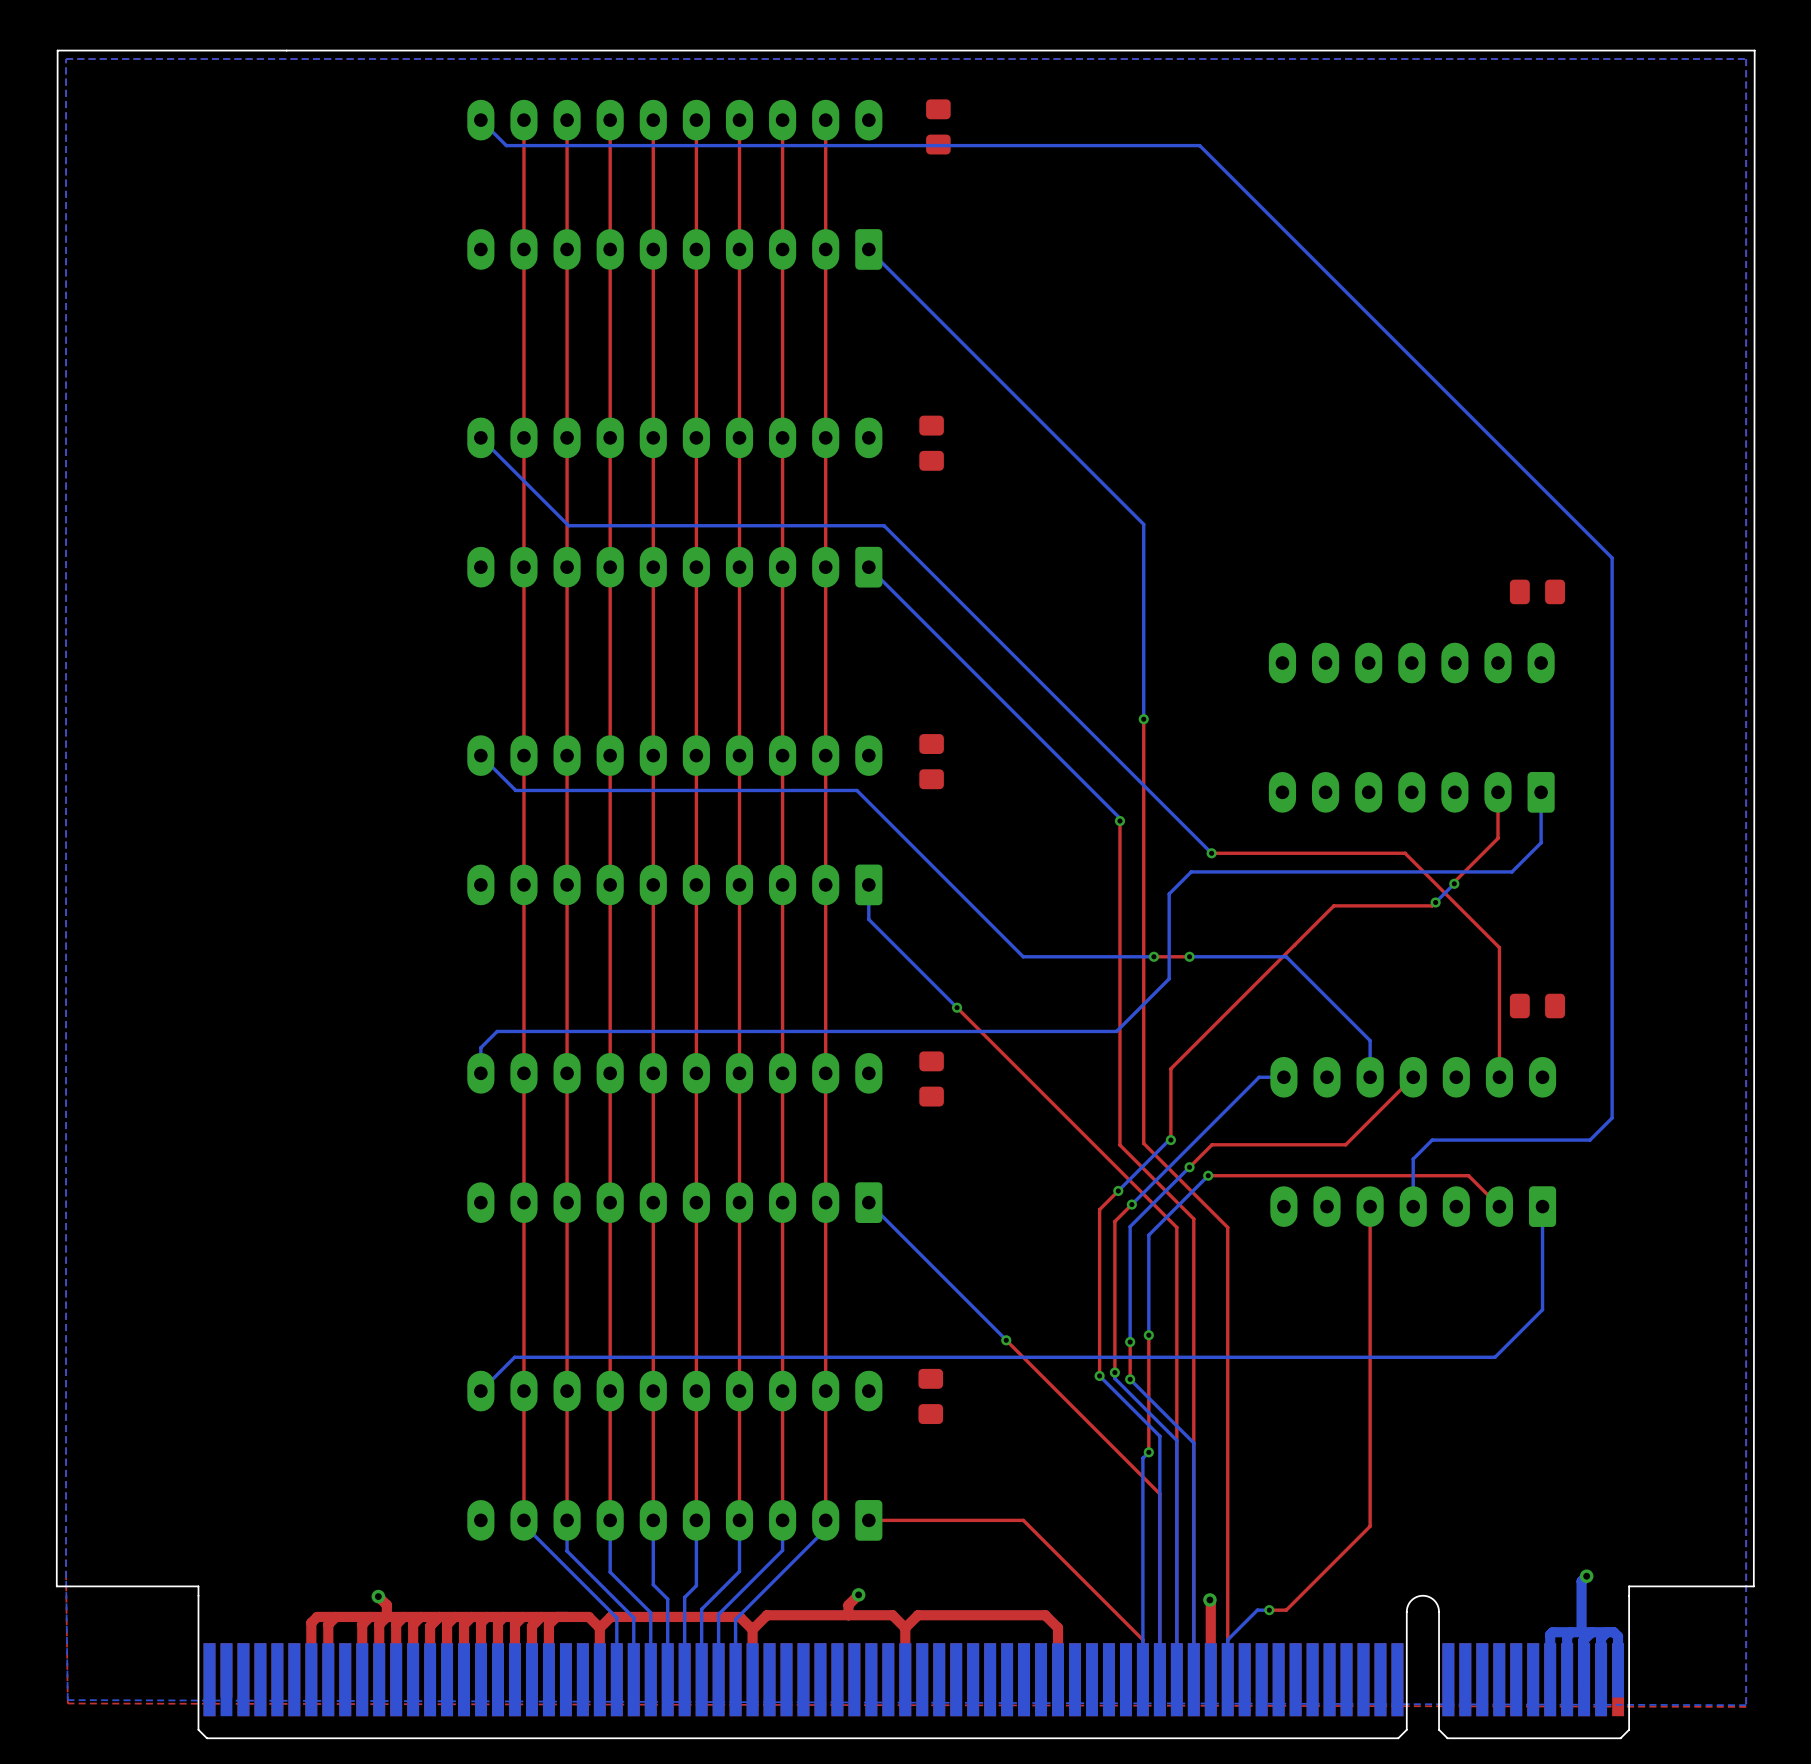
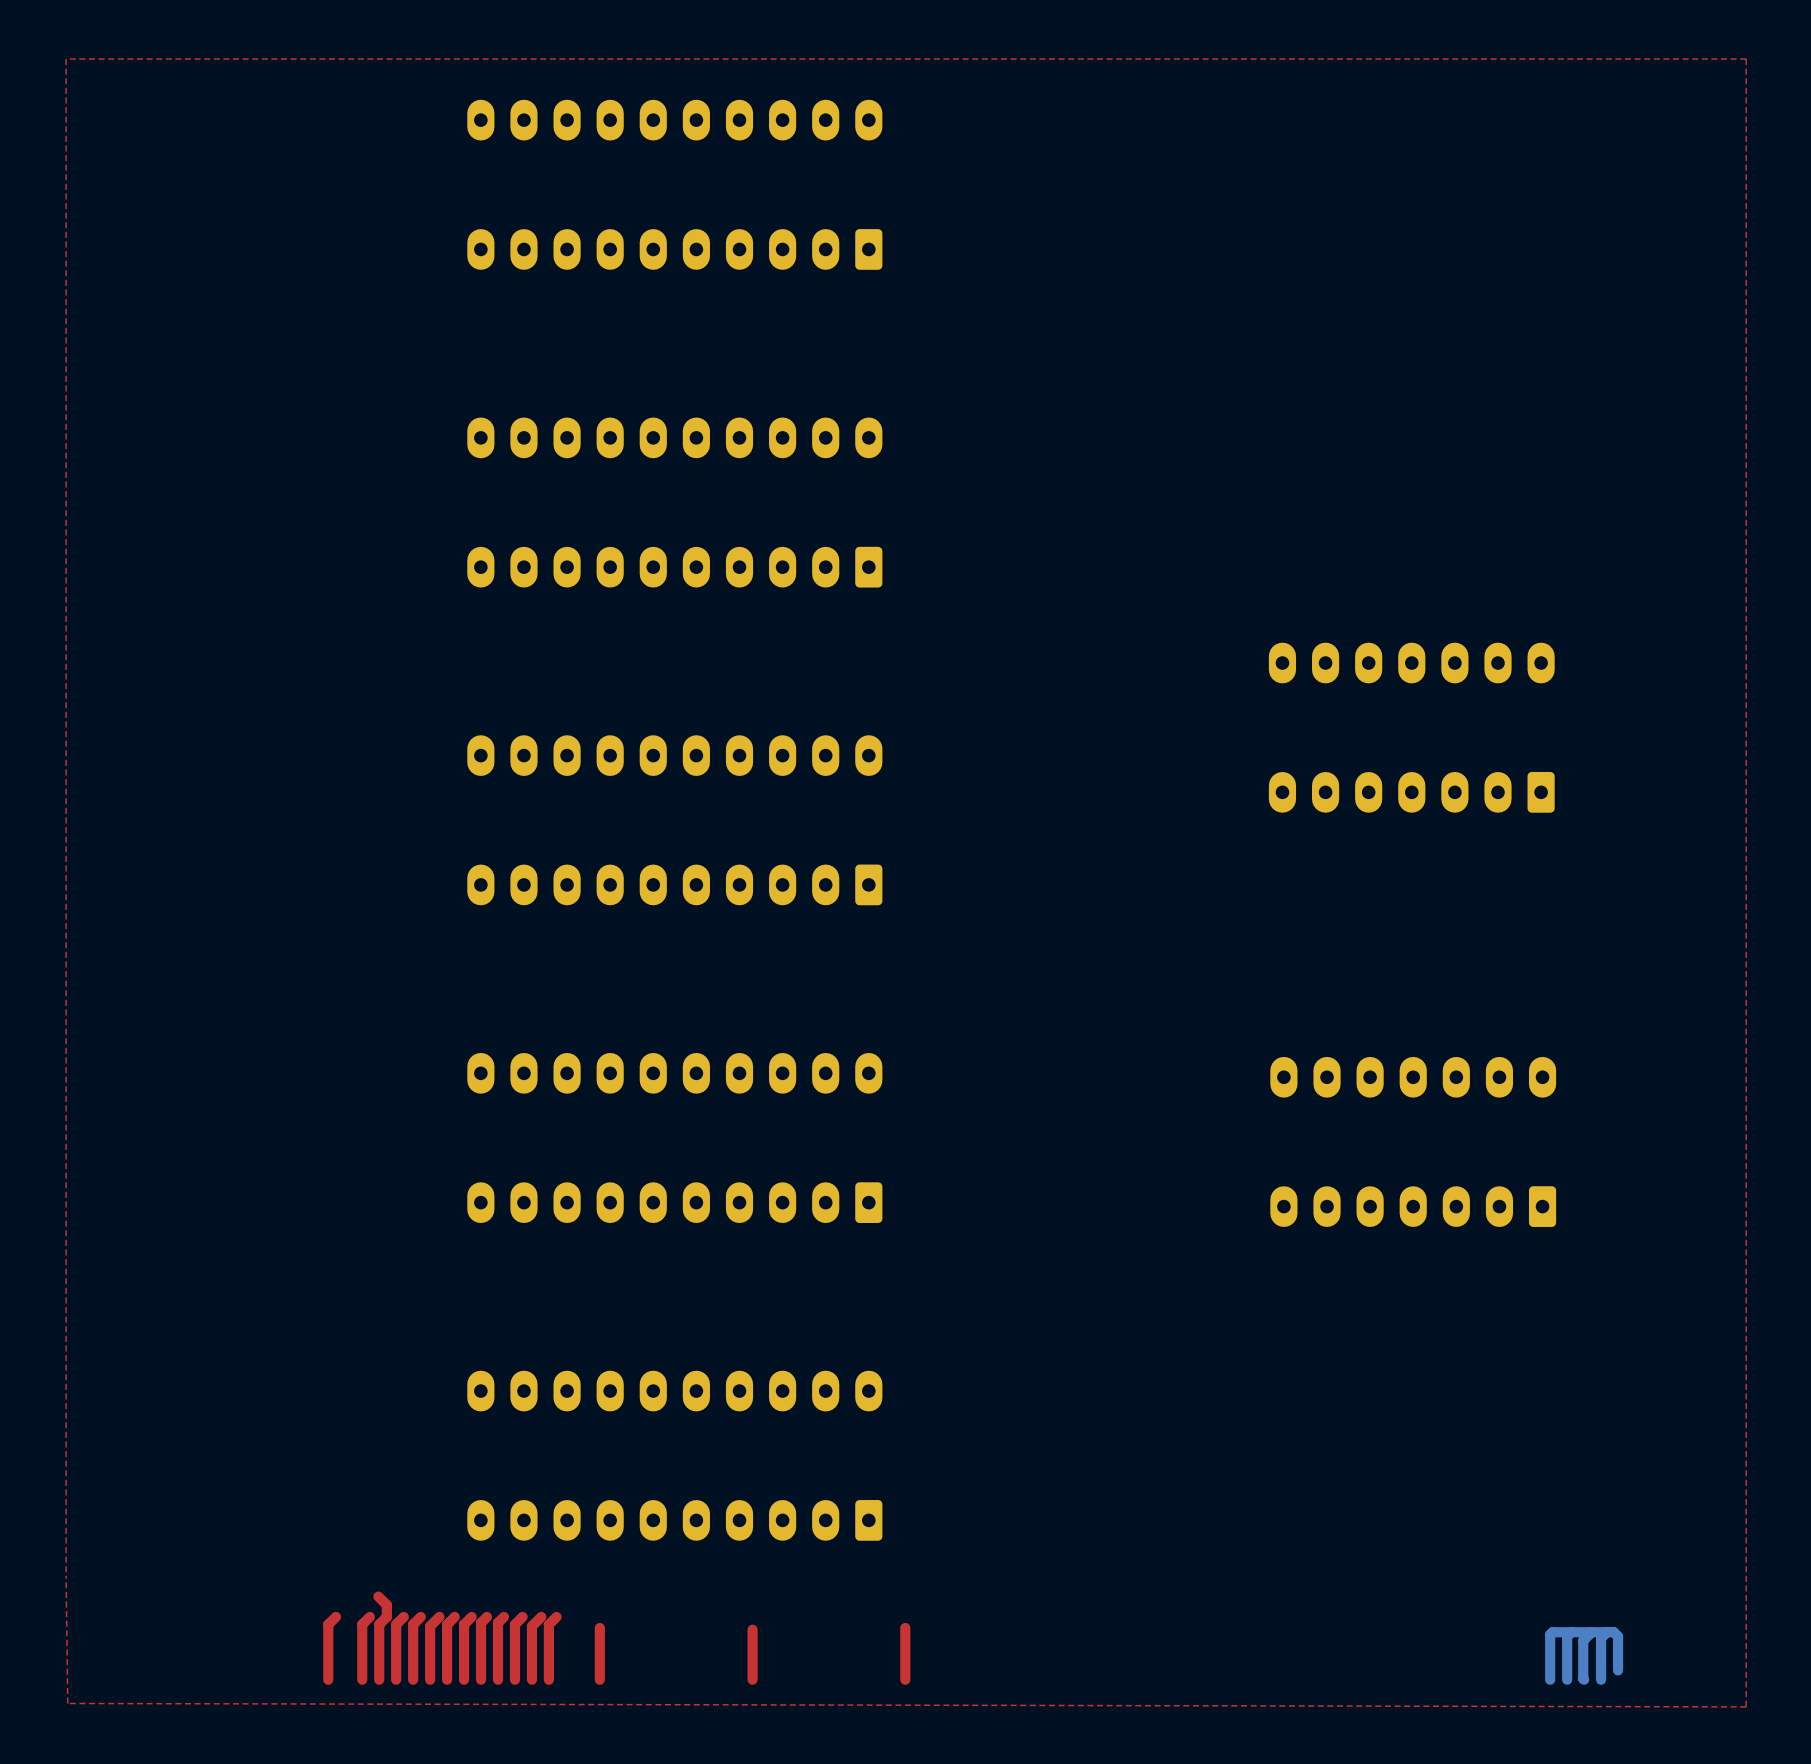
bottom zone outline: (1746, 59) (1746, 1705) (67, 1700) (66, 1577) (66, 59) (1746, 59) -> none
bottom track: (480, 120) (506, 145) (1199, 145) (1612, 557) (1612, 1118) (1590, 1140) (1432, 1140) (1413, 1159) (1413, 1206) -> none
top track: (523, 120) (523, 1520) -> none
top track: (567, 120) (567, 1520) -> none
top track: (610, 120) (610, 1520) -> none
top track: (653, 120) (653, 1520) -> none
top track: (696, 120) (696, 1520) -> none
top track: (739, 120) (739, 1520) -> none
top track: (782, 120) (782, 1520) -> none
top track: (825, 120) (825, 1520) -> none
part: (938, 126) -> none
bottom track: (868, 249) (1143, 524) (1143, 719) -> none
bottom track: (480, 437) (568, 525) (884, 525) (1211, 853) -> none
part: (931, 443) -> none
bottom track: (868, 567) (1119, 818) (1119, 821) -> none
part: (1537, 591) -> none
top track: (1143, 719) (1143, 1143) (1227, 1227) (1227, 1679) -> none
via: (1143, 719) -> none
bottom track: (480, 755) (515, 790) (856, 790) (1023, 956) (1153, 956) -> none
part: (931, 761) -> none
top track: (1498, 792) (1498, 838) (1454, 883) -> none
bottom track: (1541, 792) (1541, 842) (1512, 871) (1191, 871) (1169, 893) (1169, 978) (1116, 1031) (497, 1031) (480, 1047) (480, 1073) -> none
top track: (1119, 821) (1119, 1145) (1193, 1218) (1193, 1679) -> none
via: (1119, 821) -> none
top track: (1211, 853) (1405, 853) (1499, 947) (1499, 1077) -> none
via: (1211, 853) -> none
bottom track: (1454, 883) (1435, 902) -> none
via: (1454, 883) -> none
bottom track: (868, 884) (868, 919) (957, 1007) -> none
top track: (1435, 902) (1432, 905) (1333, 905) (1170, 1068) (1170, 1140) -> none
via: (1435, 902) -> none
via: (1153, 956) -> none
top track: (1189, 956) (1153, 956) -> none
bottom track: (1189, 956) (1286, 956) (1370, 1040) (1370, 1077) -> none
via: (1189, 956) -> none
part: (1537, 1006) -> none
top track: (957, 1007) (1176, 1227) (1176, 1679) -> none
via: (957, 1007) -> none
bottom track: (1283, 1077) (1259, 1077) (1131, 1204) -> none
top track: (1413, 1077) (1345, 1144) (1211, 1144) (1189, 1167) -> none
part: (931, 1078) -> none
bottom track: (1170, 1140) (1118, 1190) -> none
via: (1170, 1140) -> none
bottom track: (1189, 1167) (1130, 1226) (1130, 1342) -> none
via: (1189, 1167) -> none
top track: (1208, 1175) (1468, 1175) (1499, 1206) -> none
bottom track: (1208, 1175) (1148, 1235) (1148, 1335) -> none
via: (1208, 1175) -> none
top track: (1118, 1190) (1099, 1209) (1099, 1375) -> none
via: (1118, 1190) -> none
bottom track: (868, 1202) (1006, 1340) -> none
top track: (1131, 1204) (1114, 1221) (1114, 1372) -> none
via: (1131, 1204) -> none
top track: (1370, 1206) (1370, 1526) (1286, 1610) (1269, 1610) -> none
bottom track: (1542, 1206) (1542, 1309) (1495, 1357) (514, 1357) (480, 1391) -> none
top track: (1148, 1335) (1148, 1452) -> none
via: (1148, 1335) -> none
top track: (1006, 1340) (1159, 1493) (1159, 1679) -> none
via: (1006, 1340) -> none
top track: (1130, 1342) (1130, 1379) -> none
via: (1130, 1342) -> none
bottom track: (1114, 1372) (1114, 1378) (1176, 1440) (1176, 1679) -> none
via: (1114, 1372) -> none
bottom track: (1099, 1375) (1159, 1436) (1159, 1679) -> none
via: (1099, 1375) -> none
bottom track: (1130, 1379) (1193, 1442) (1193, 1679) -> none
via: (1130, 1379) -> none
part: (930, 1396) -> none
bottom track: (1148, 1452) (1142, 1458) (1142, 1679) -> none
via: (1148, 1452) -> none
bottom track: (523, 1520) (523, 1524) (616, 1617) (616, 1679) -> none
bottom track: (567, 1520) (567, 1551) (633, 1617) (633, 1679) -> none
bottom track: (610, 1520) (610, 1572) (650, 1612) (650, 1679) -> none
bottom track: (653, 1520) (653, 1584) (667, 1599) (667, 1679) -> none
bottom track: (696, 1520) (696, 1585) (684, 1597) (684, 1679) -> none
bottom track: (739, 1520) (739, 1571) (701, 1609) (701, 1679) -> none
bottom track: (782, 1520) (782, 1550) (718, 1614) (718, 1679) -> none
bottom track: (825, 1520) (825, 1529) (735, 1619) (735, 1679) -> none
top track: (868, 1520) (1023, 1520) (1142, 1639) (1142, 1679) -> none
bottom track: (1586, 1576) (1581, 1581) (1581, 1632) -> none
via: (1586, 1576) -> none
top track: (858, 1594) (848, 1605) (848, 1615) -> none
via: (858, 1594) -> none
board edge: (1629, 1595) (1629, 1586) (1753, 1586) (1754, 50) (57, 50) (56, 1586) (198, 1586) (198, 1595) -> none
via: (378, 1596) -> none
top track: (1209, 1599) (1210, 1679) -> none
via: (1209, 1599) -> none
bottom track: (1269, 1610) (1257, 1610) (1227, 1639) (1227, 1679) -> none
via: (1269, 1610) -> none
part: (913, 1667) -> none
top track: (1058, 1679) (1058, 1627) (1045, 1615) (918, 1615) (905, 1627) (892, 1615) (766, 1615) (752, 1629) (739, 1616) (610, 1616) (599, 1627) (588, 1616) (317, 1616) (311, 1622) (311, 1679) -> none

